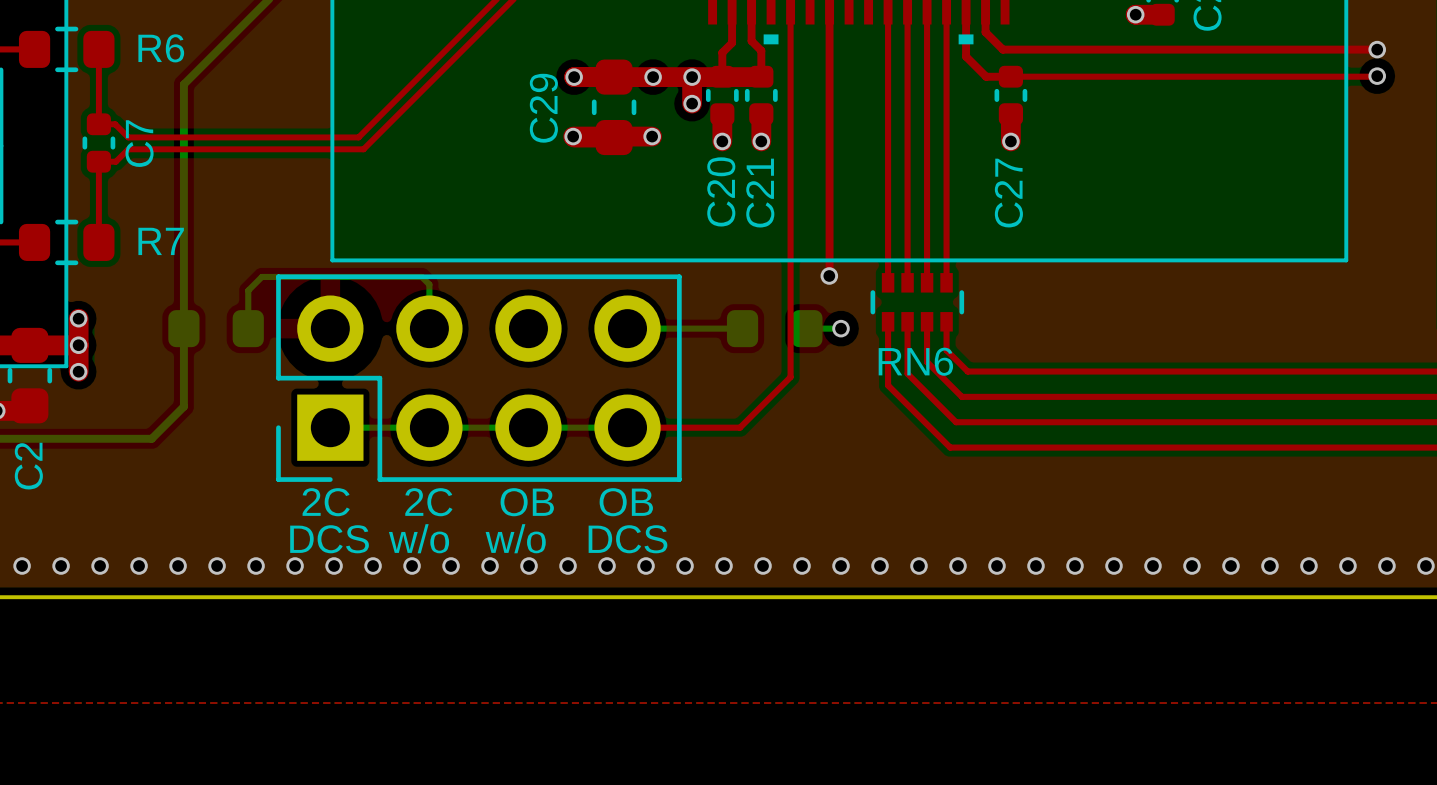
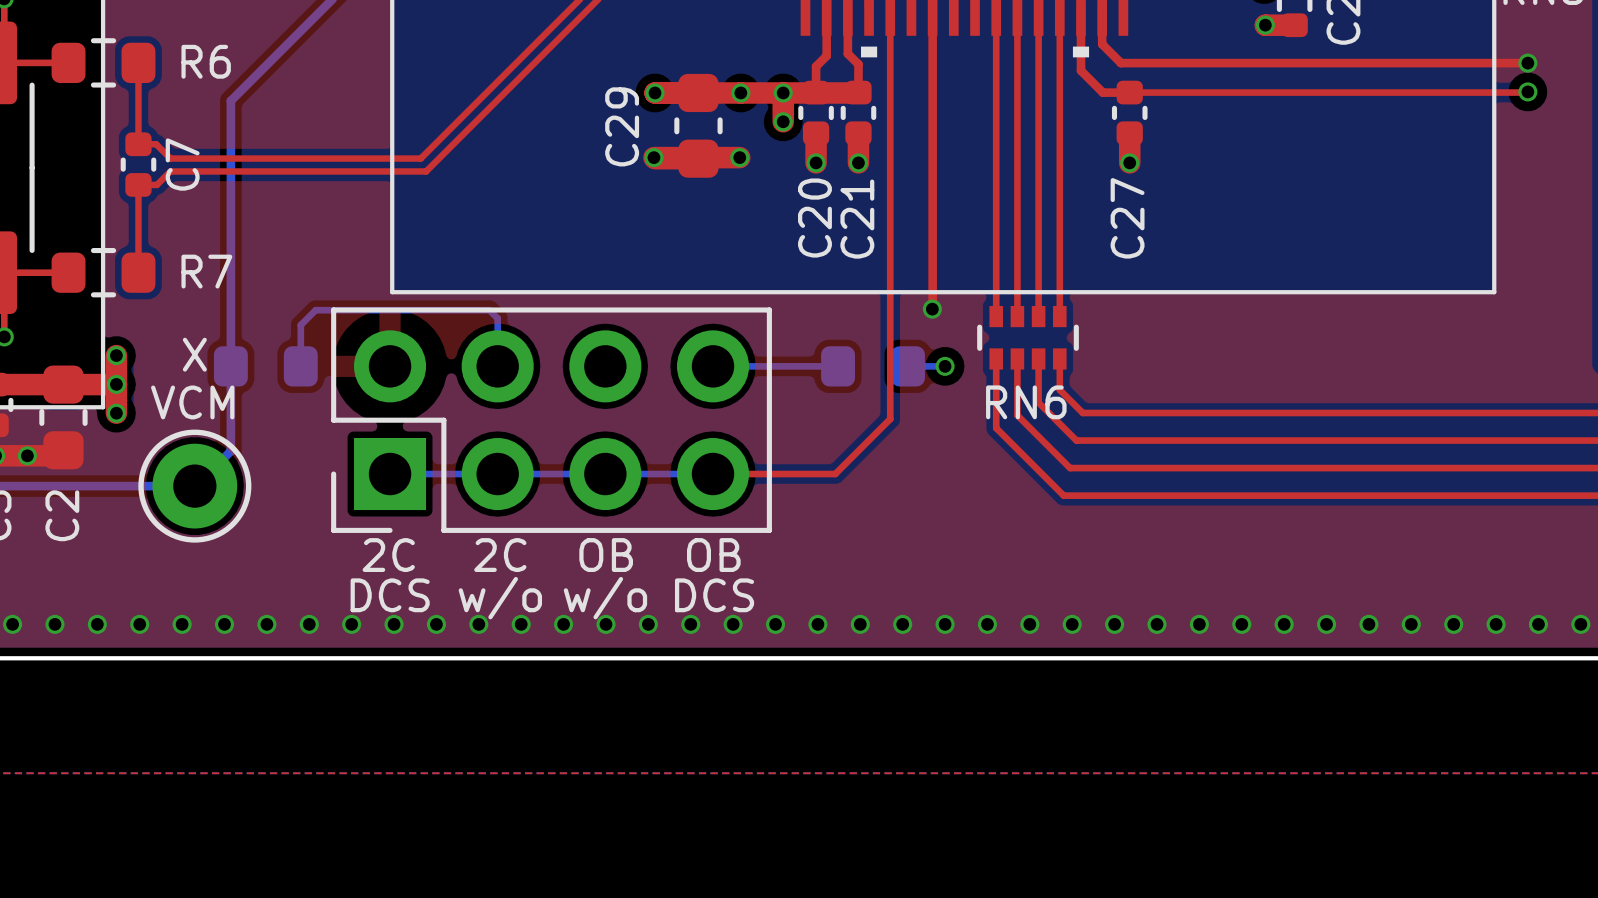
text: none -> X (194, 354)
text: none -> VCM (192, 402)
part: none -> (194, 486)

